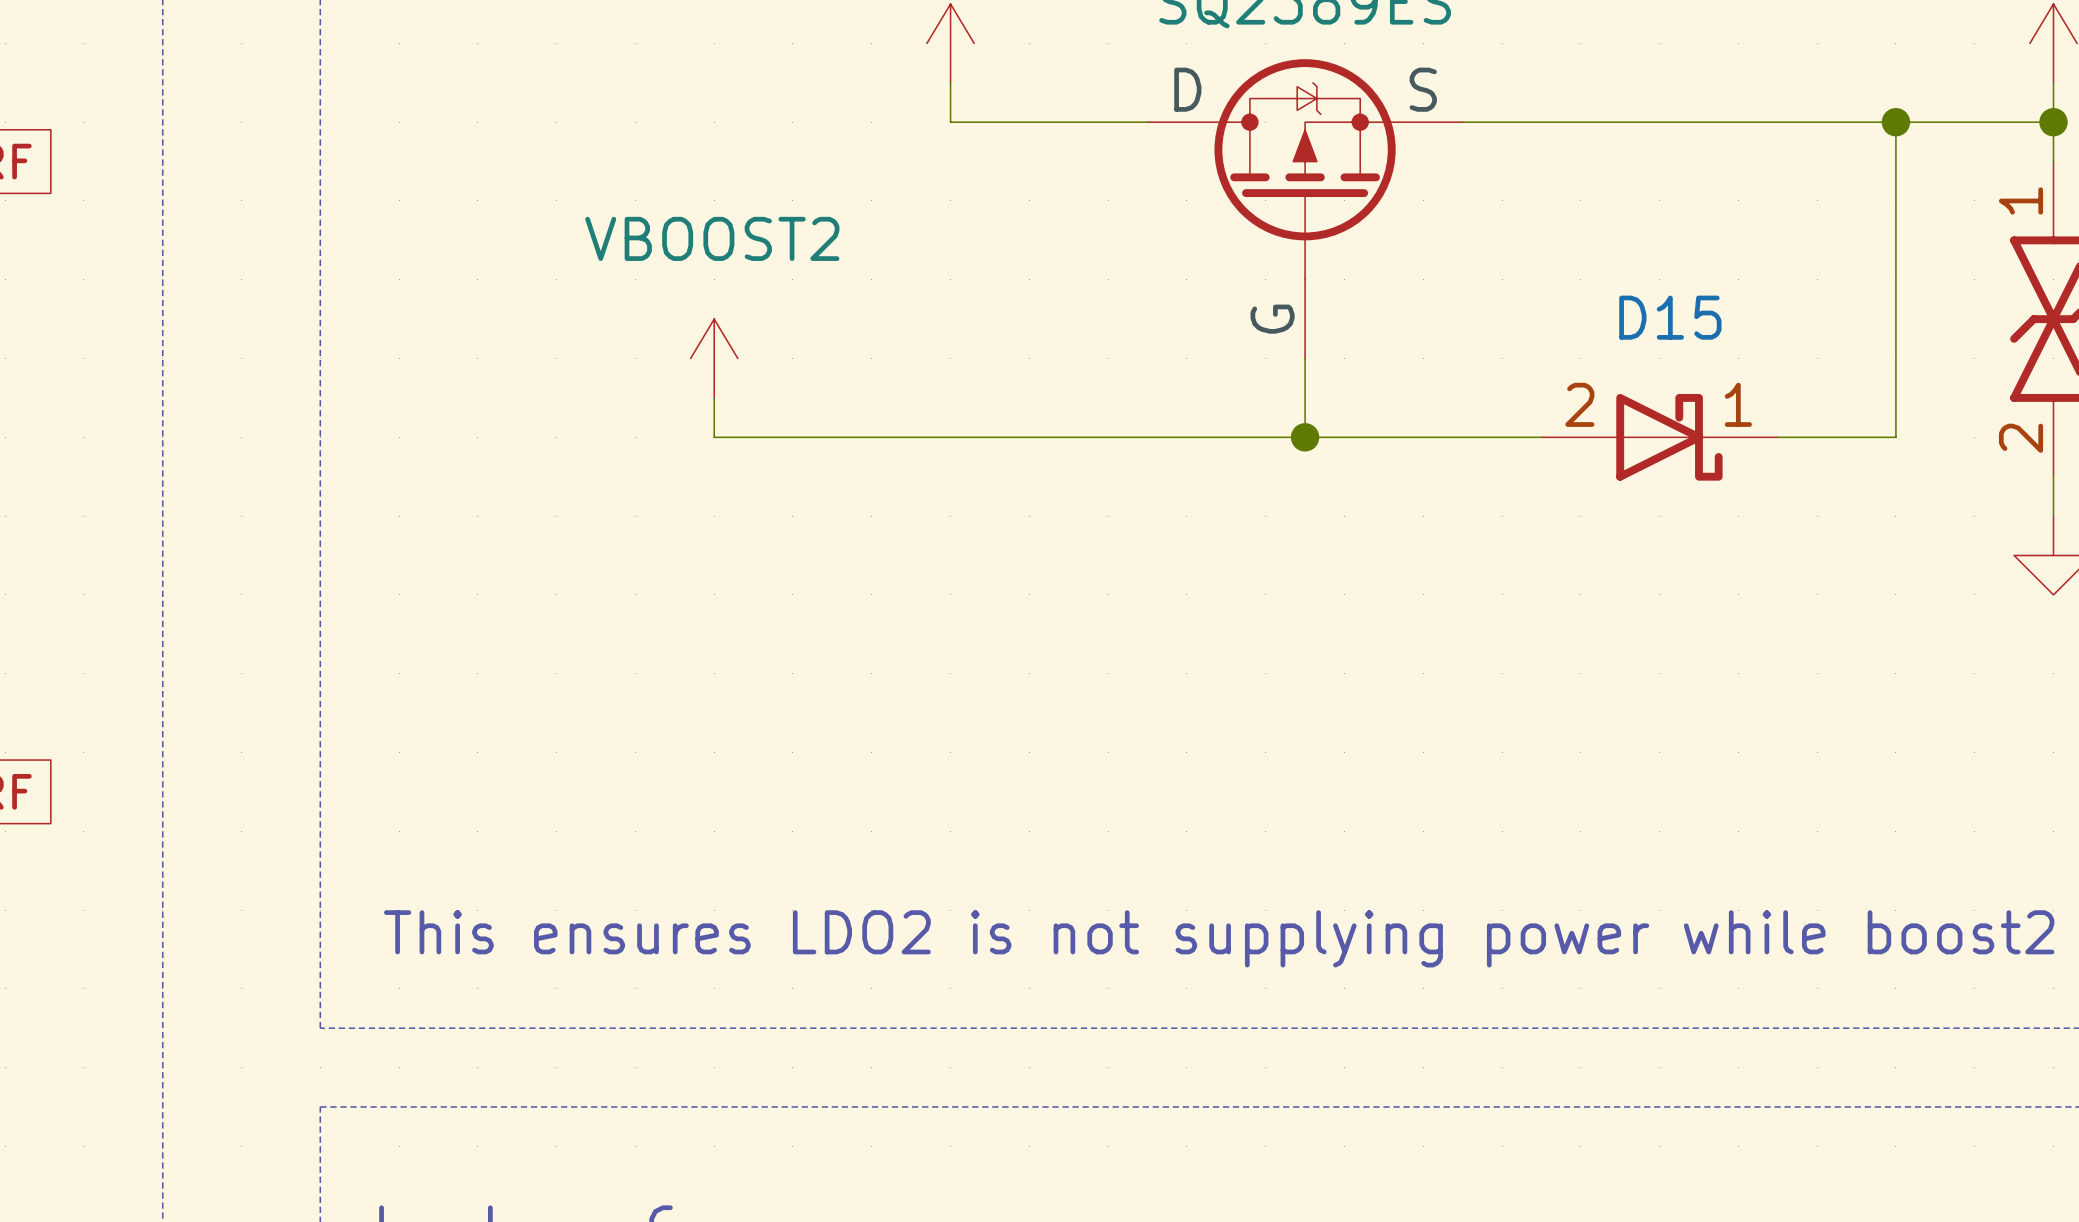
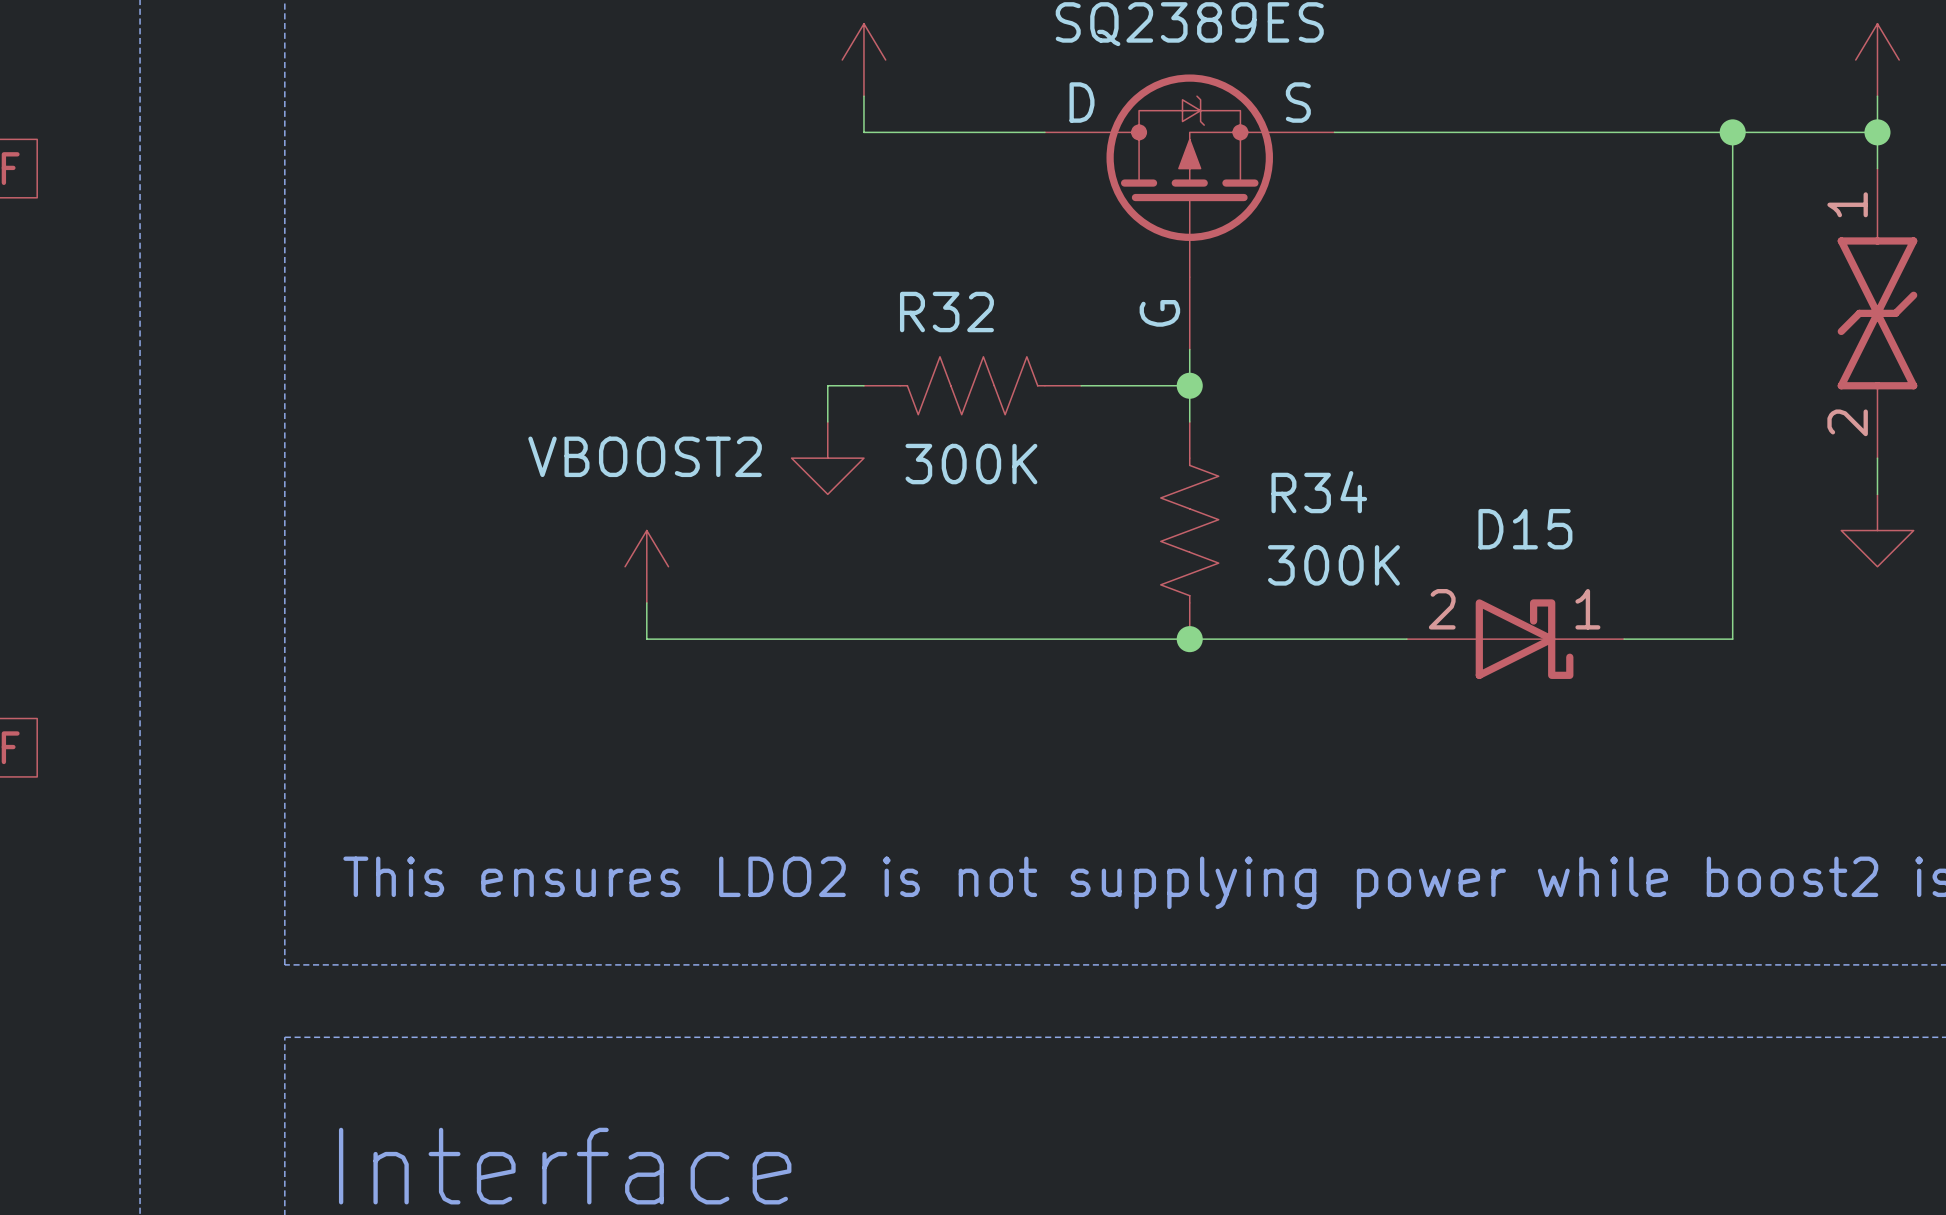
power symbol position: VBOOST2 (714, 358) -> VBOOST2 (646, 566)
wire: (714, 397) (714, 437) (1541, 437) -> (646, 602) (646, 639) (1406, 639)
wire: none -> (863, 385) (827, 385) (827, 421)
R32: none -> 300K (972, 385)
wire: none -> (1081, 385) (1189, 385)
junction position: (1305, 437) -> (1189, 385)
D15 position: (1659, 437) -> (1515, 639)
wire: (1777, 437) (1895, 437) -> (1624, 639) (1732, 639) (1732, 421)
power symbol: none -> (827, 458)
R34: none -> 300K (1189, 530)
junction: none -> (1189, 639)

